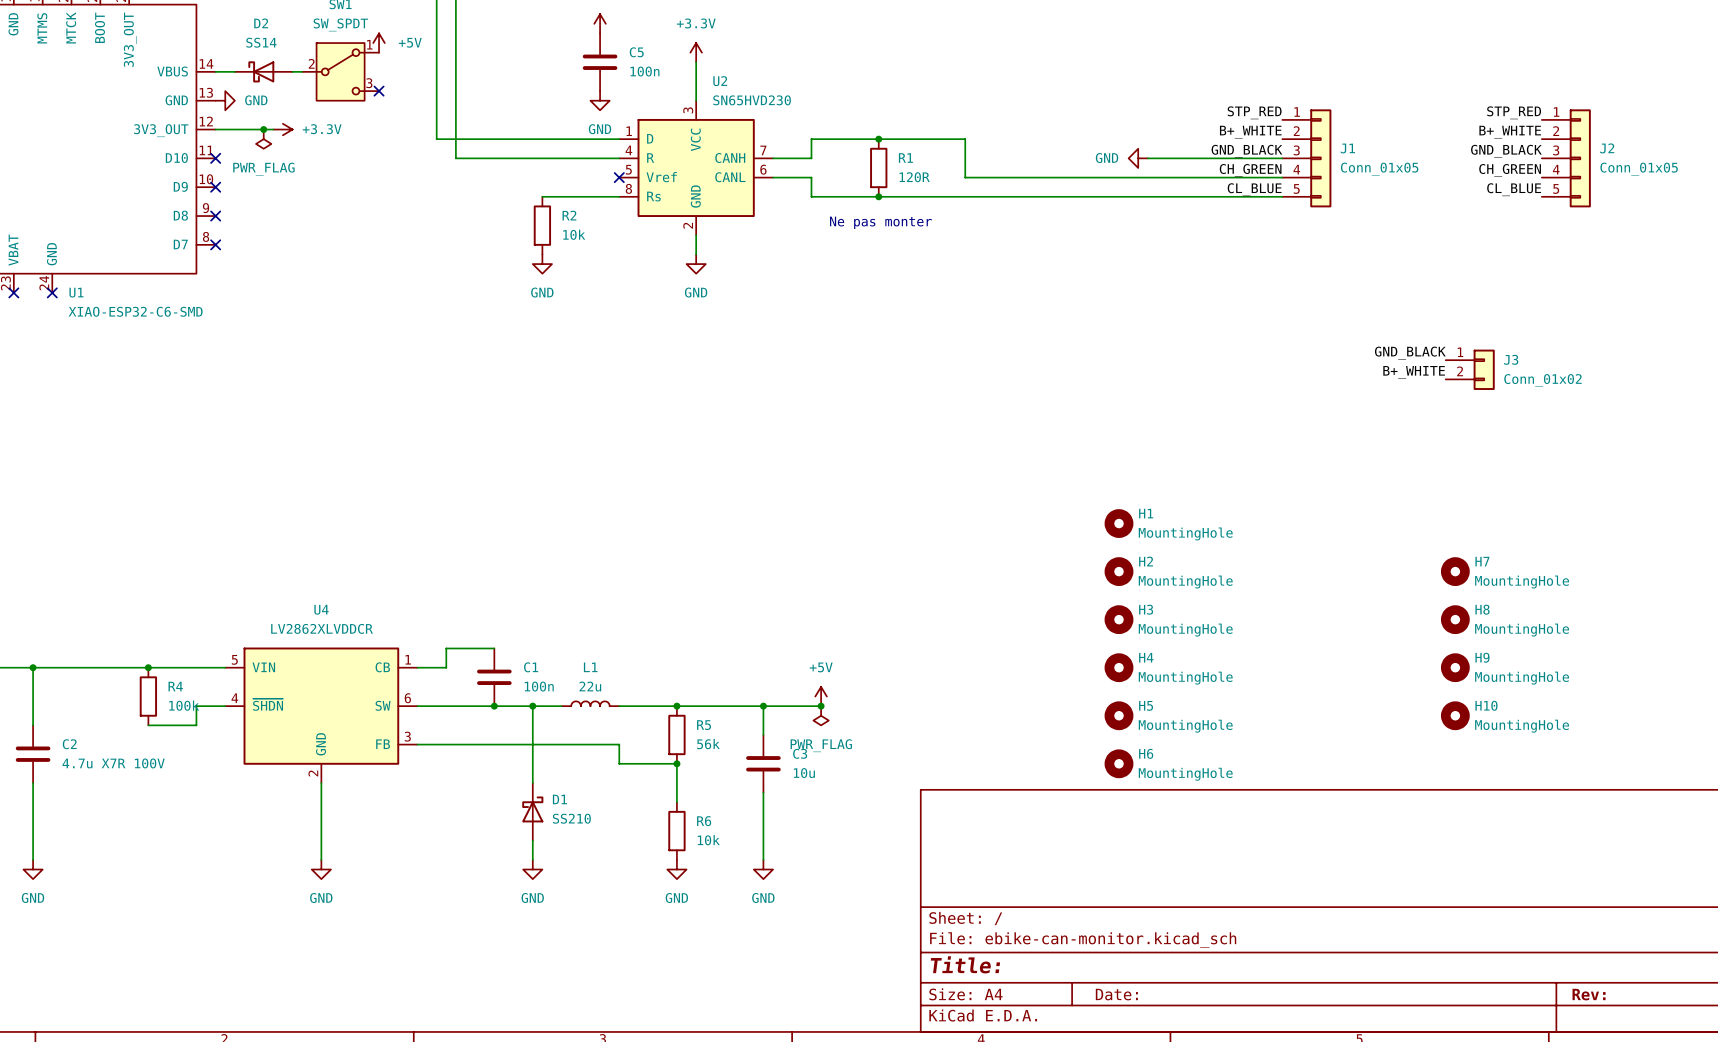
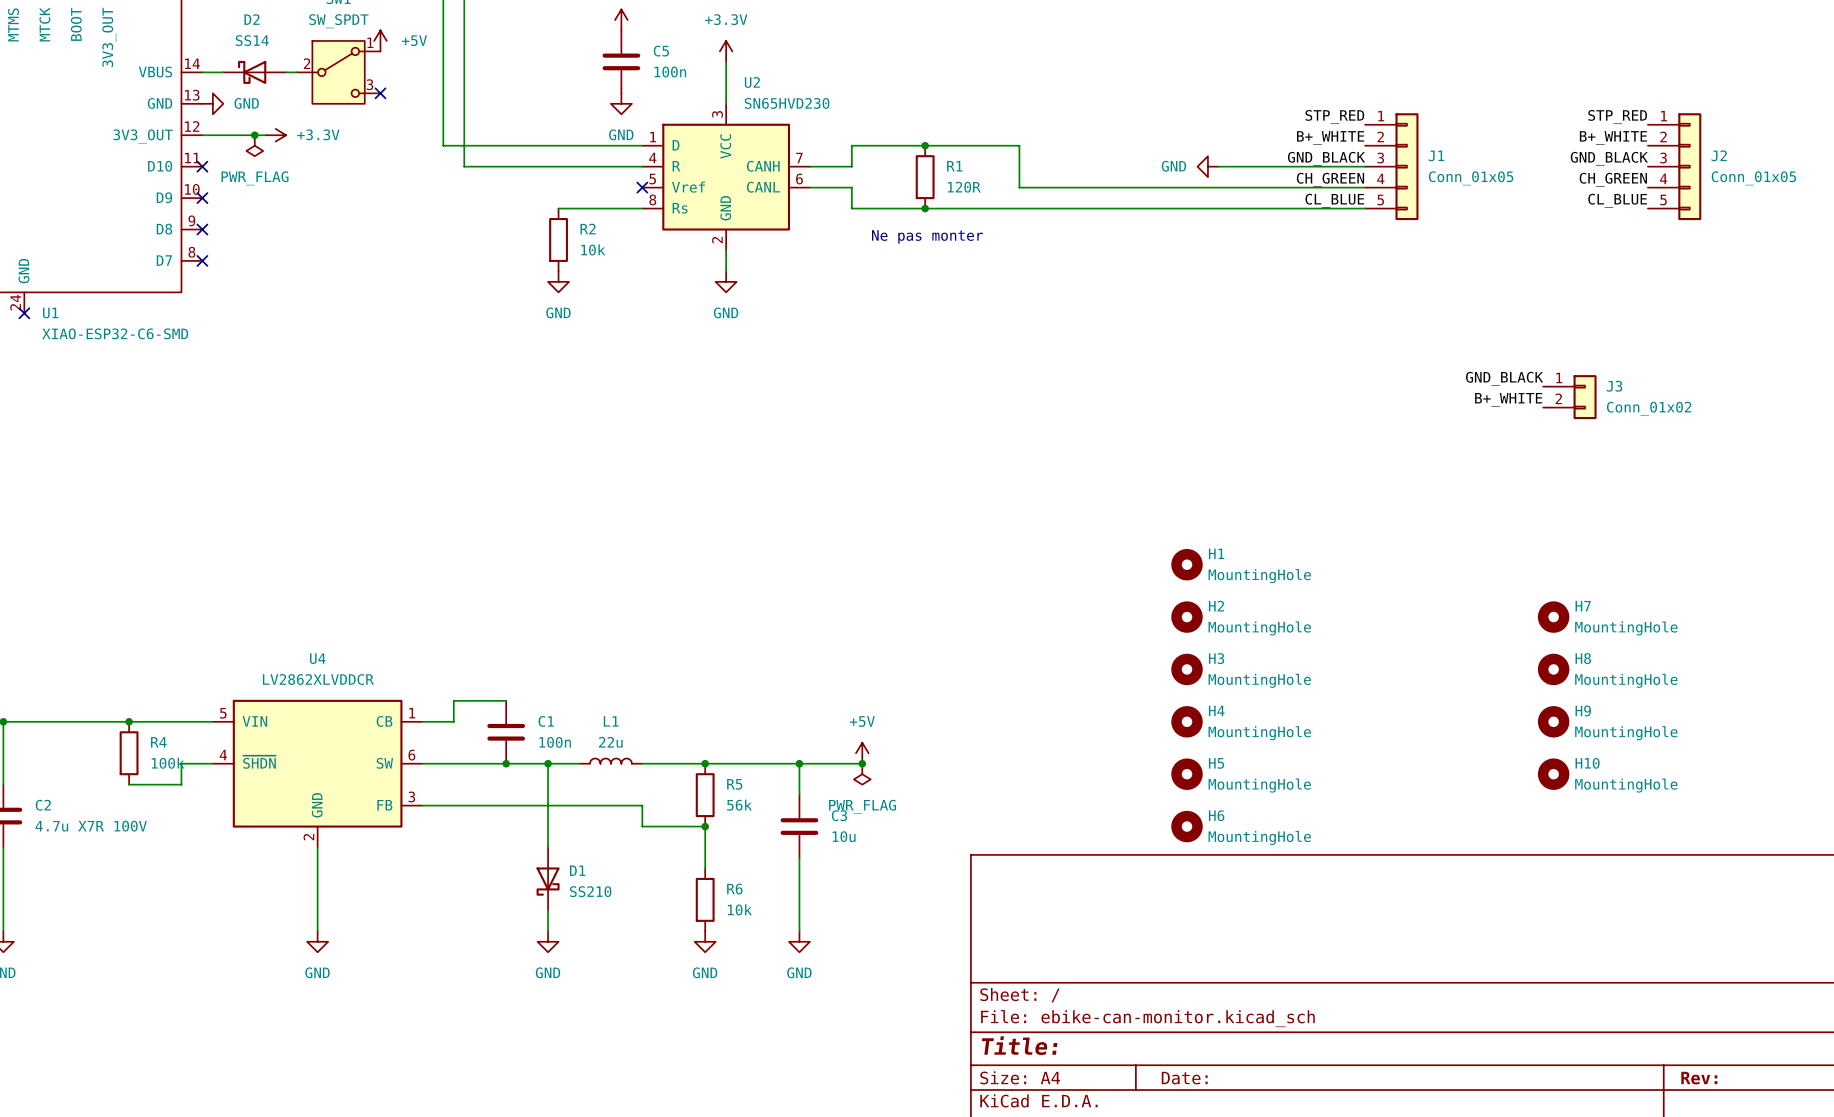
D1 rotation: 0° (532, 809) -> 180° (548, 881)

